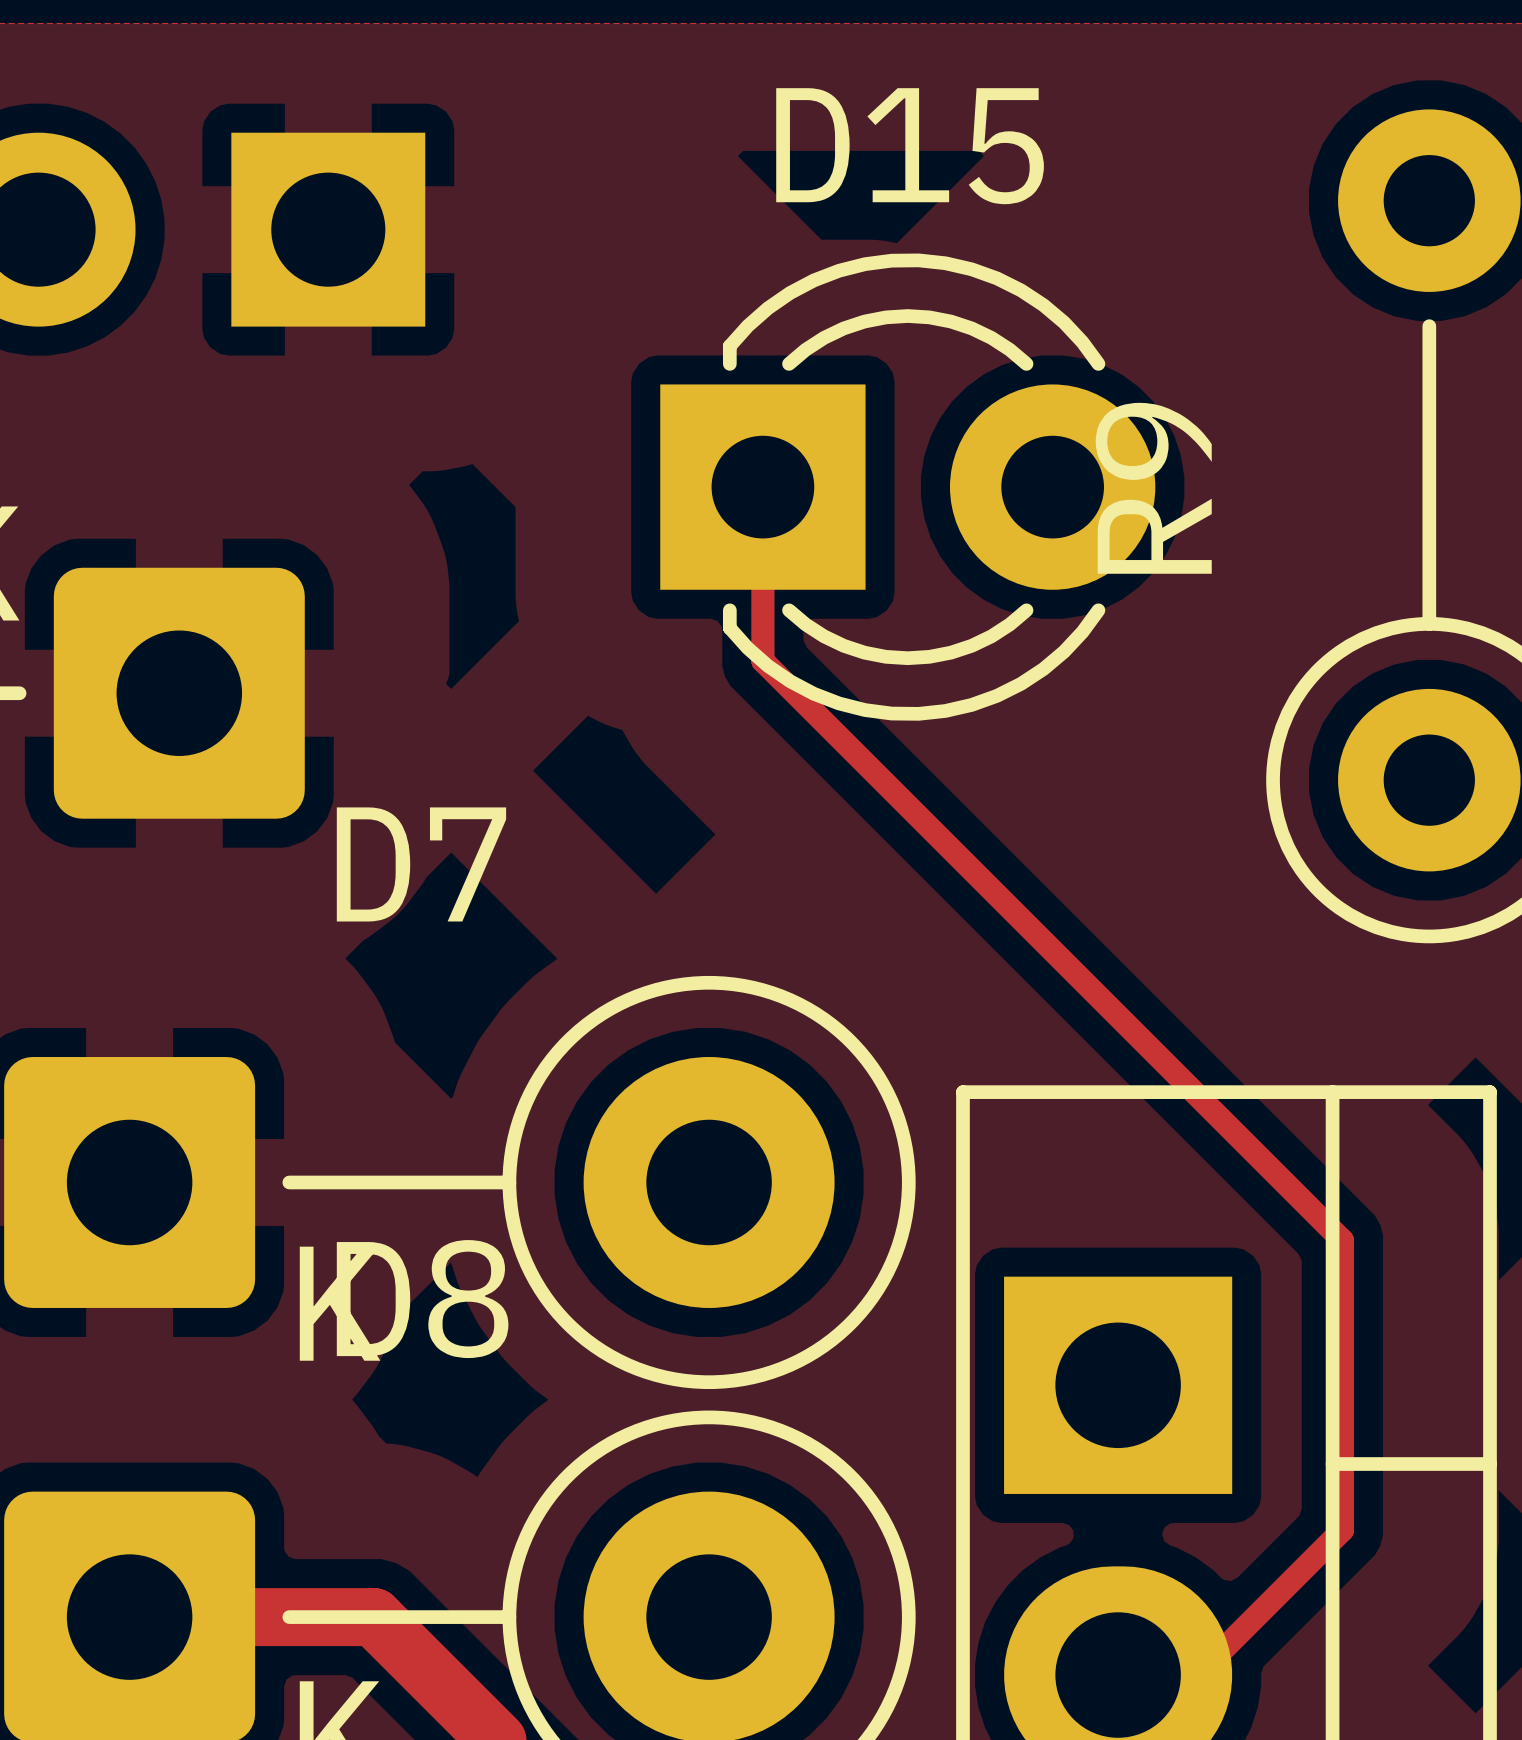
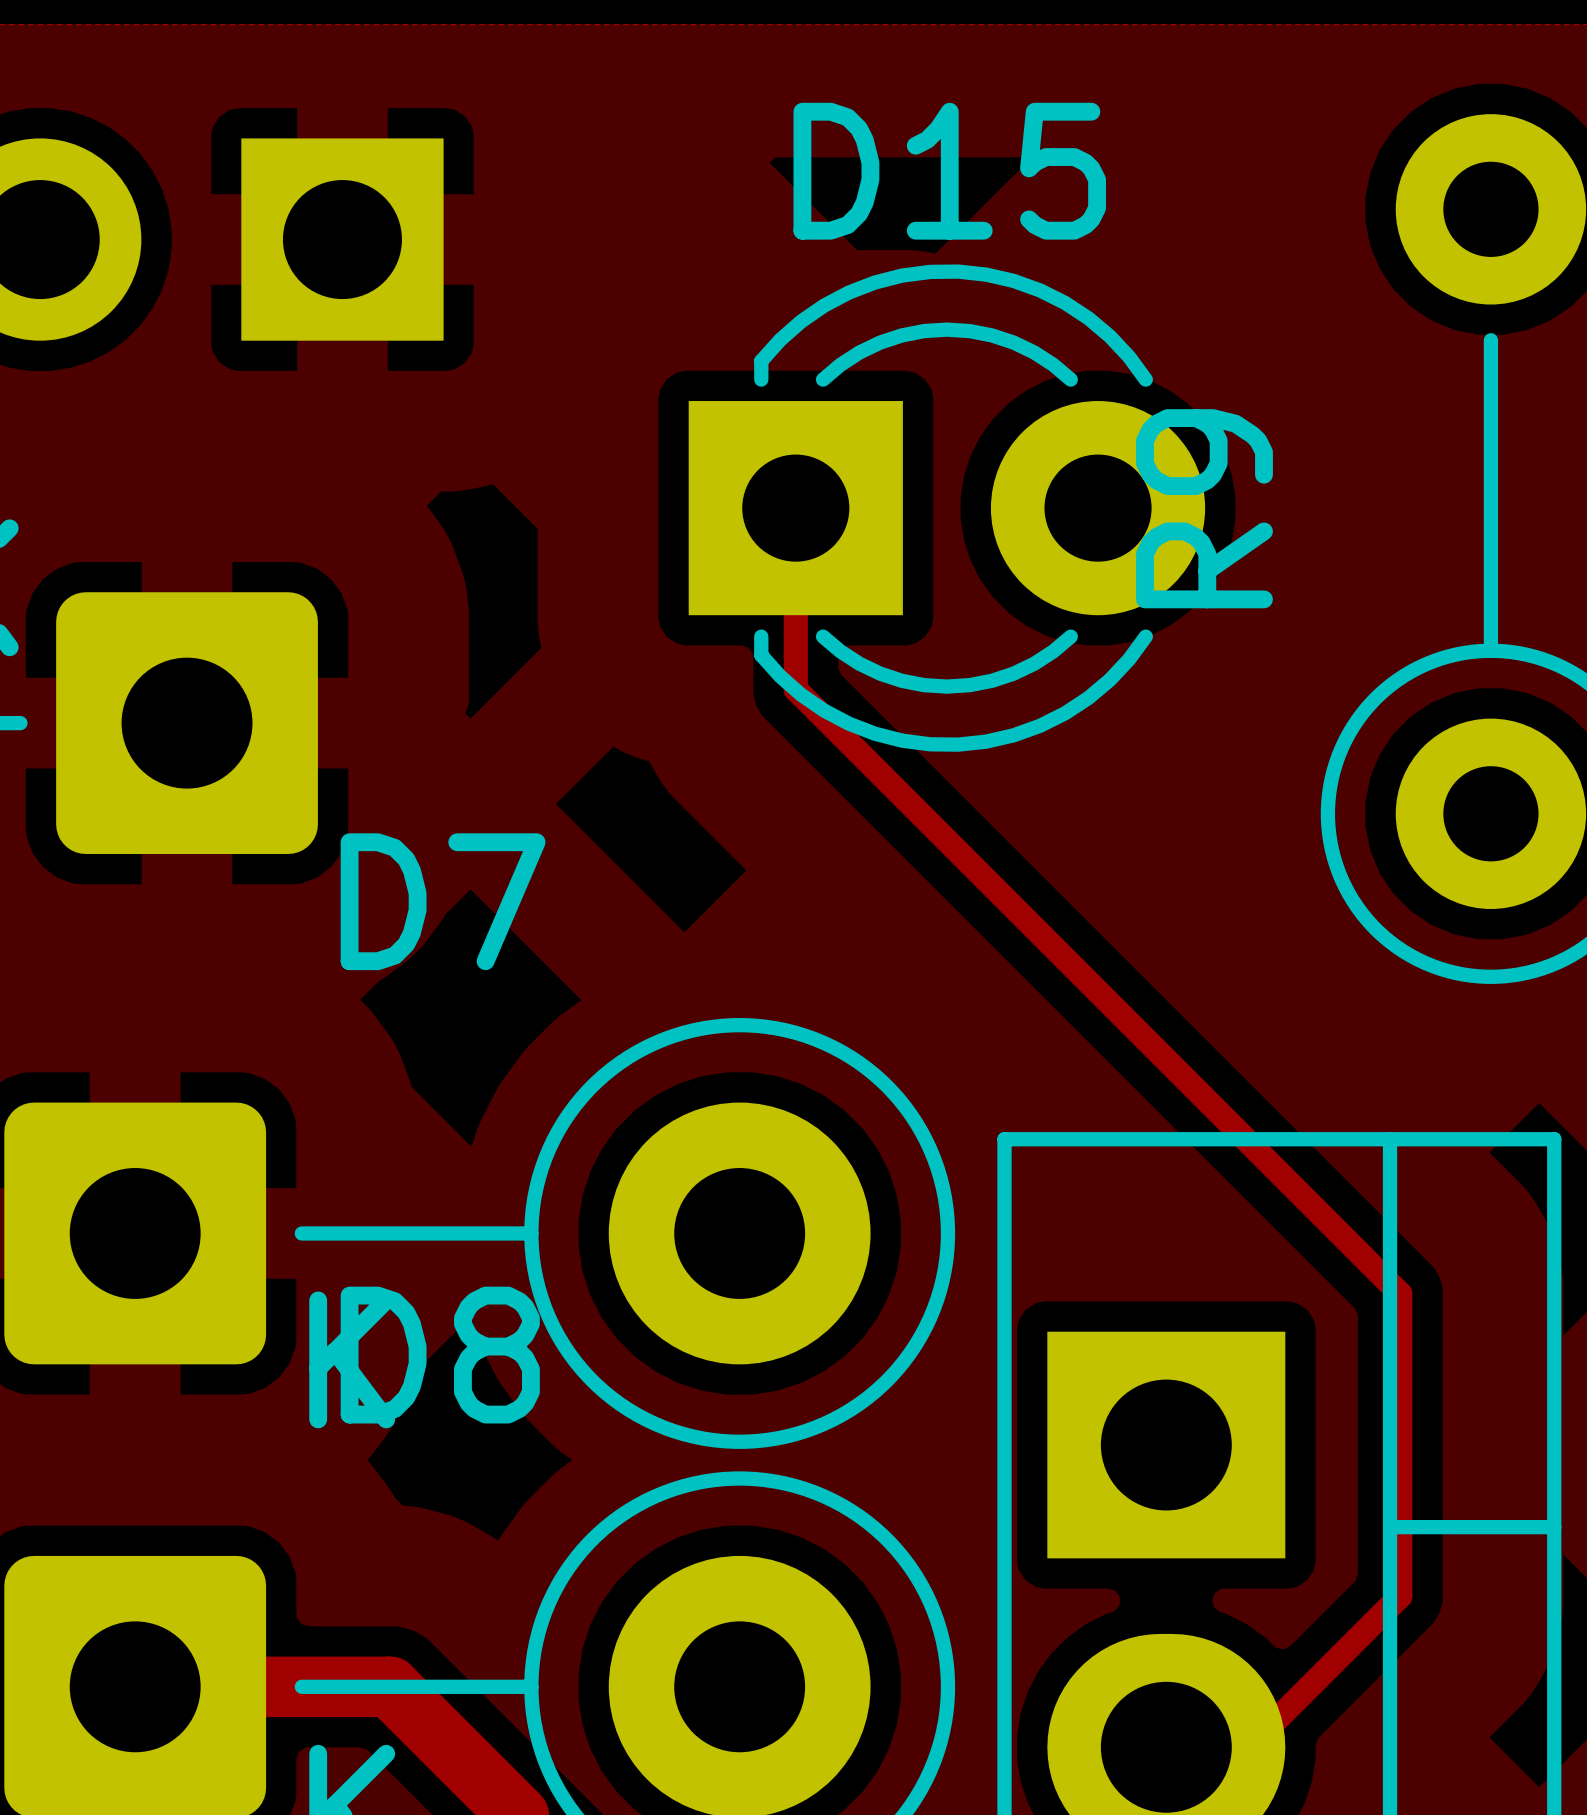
D15 name position: D15 (910, 146) -> D15 (949, 171)

